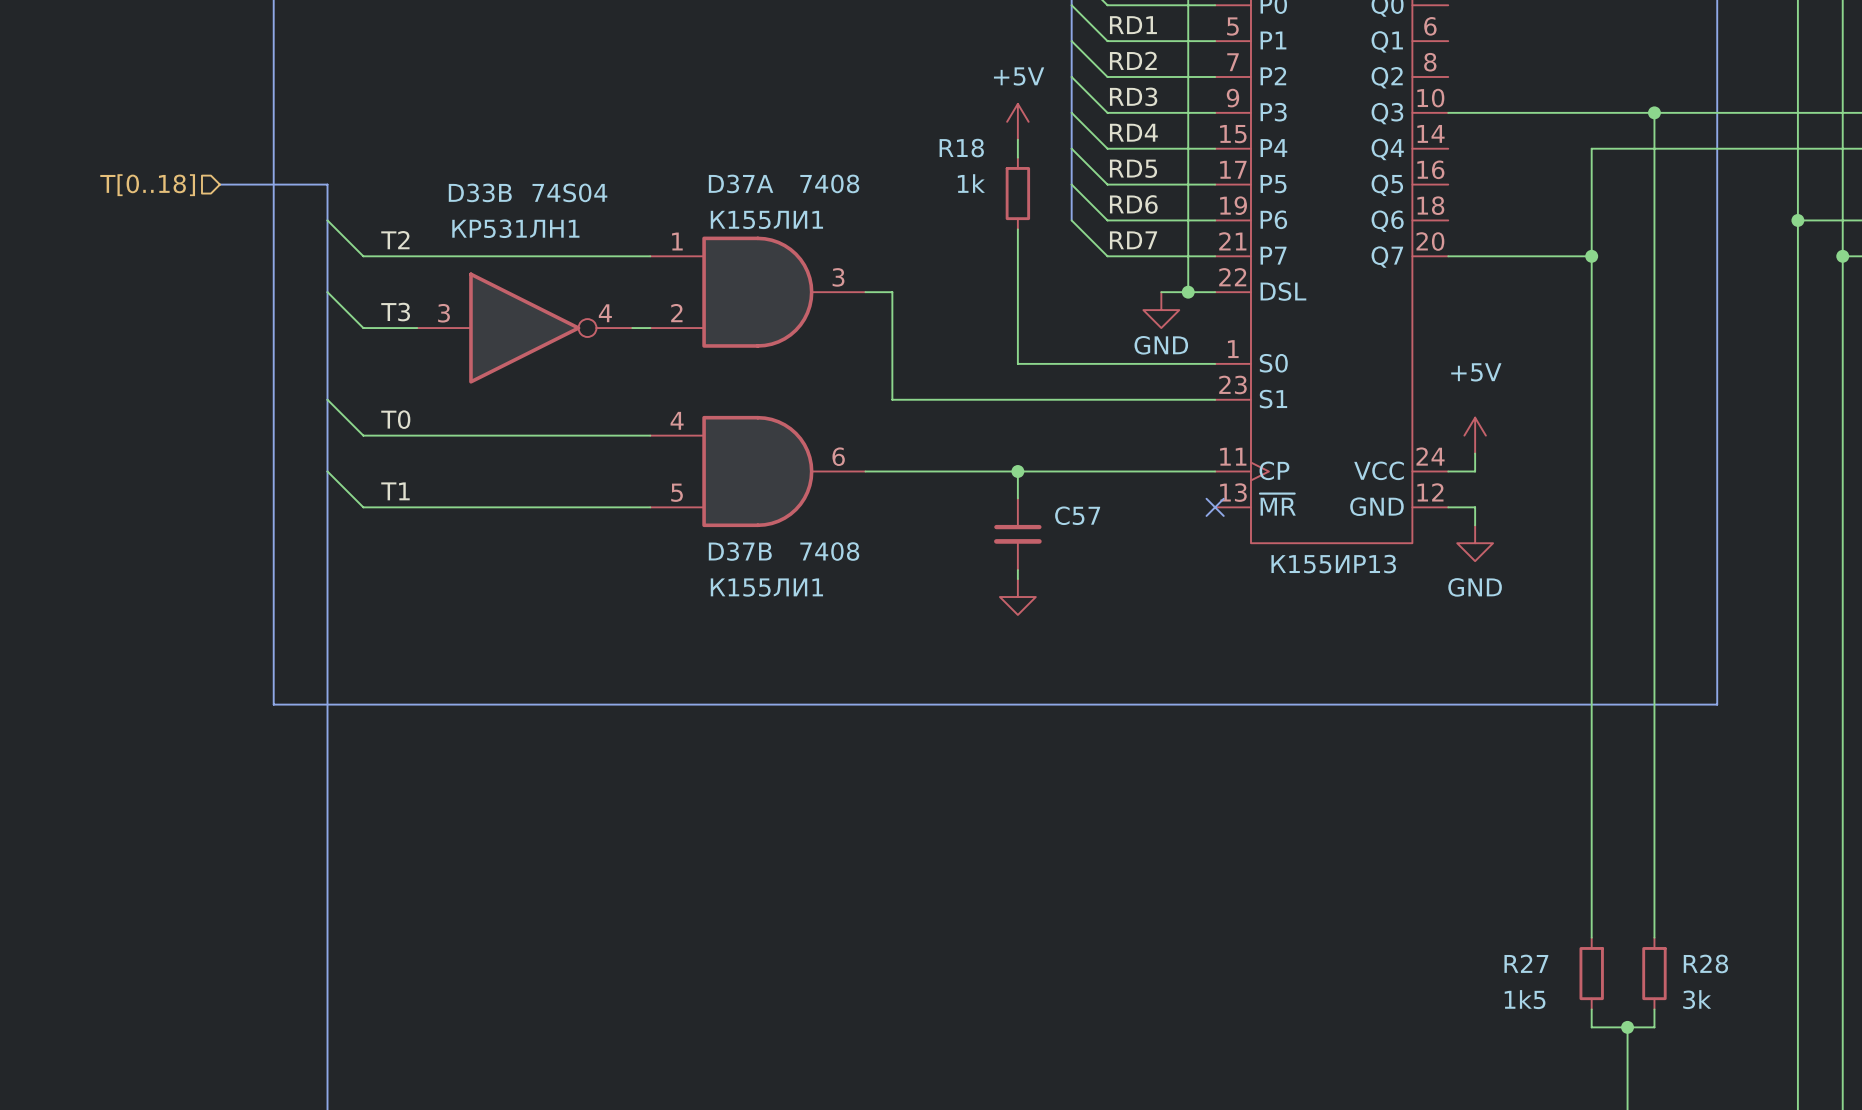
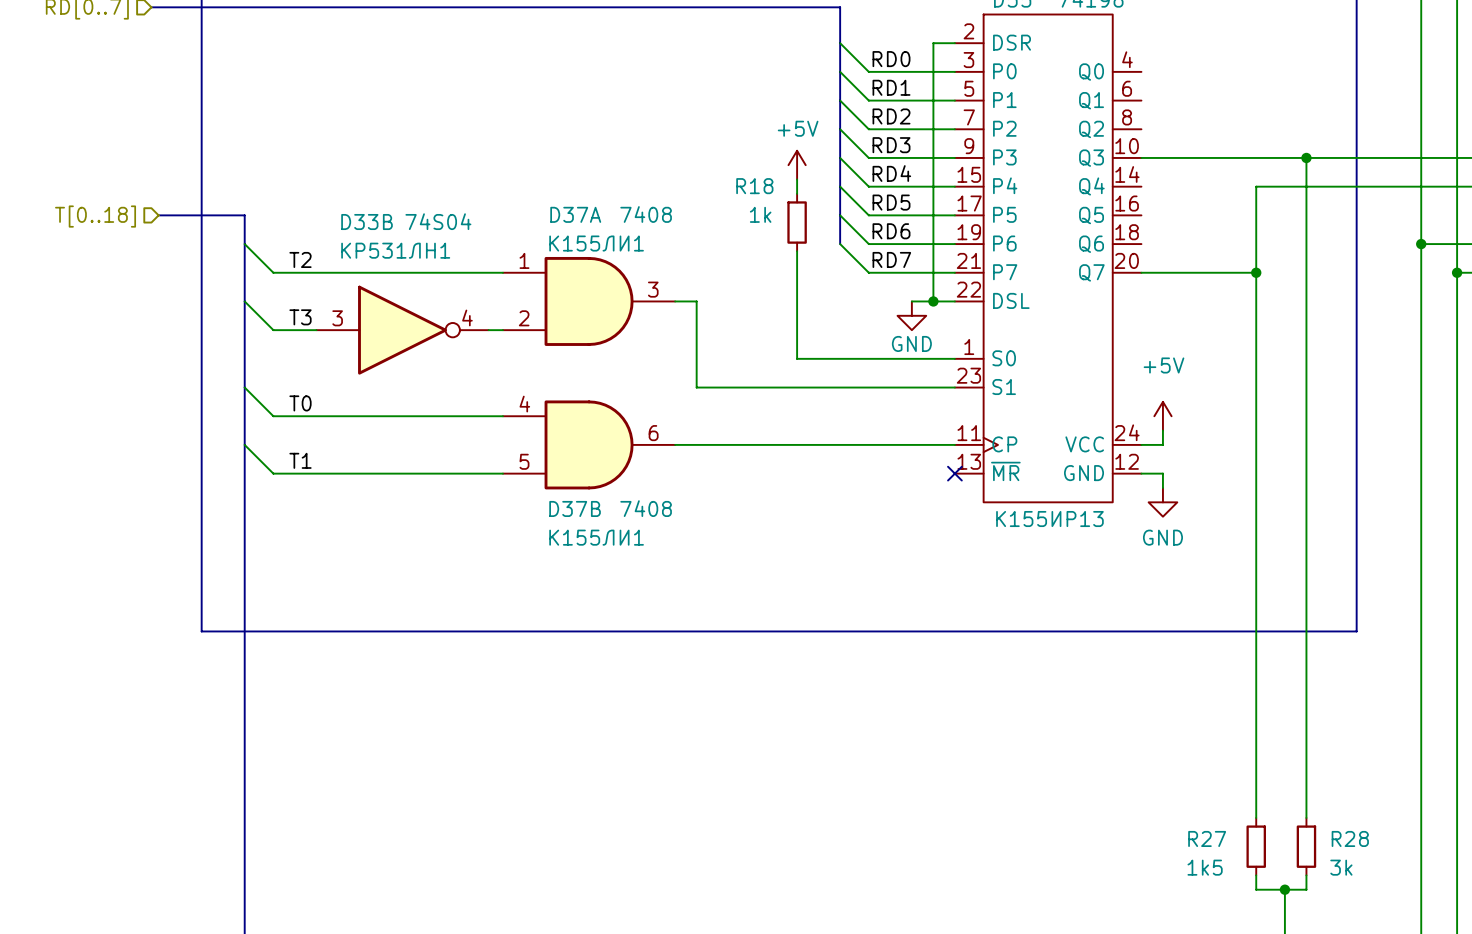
wire: (1017, 471) (1017, 498) -> none
junction: (1017, 471) -> none
C57: (1017, 534) -> none
wire: (1017, 570) (1017, 579) -> none
power symbol: (1017, 597) -> none

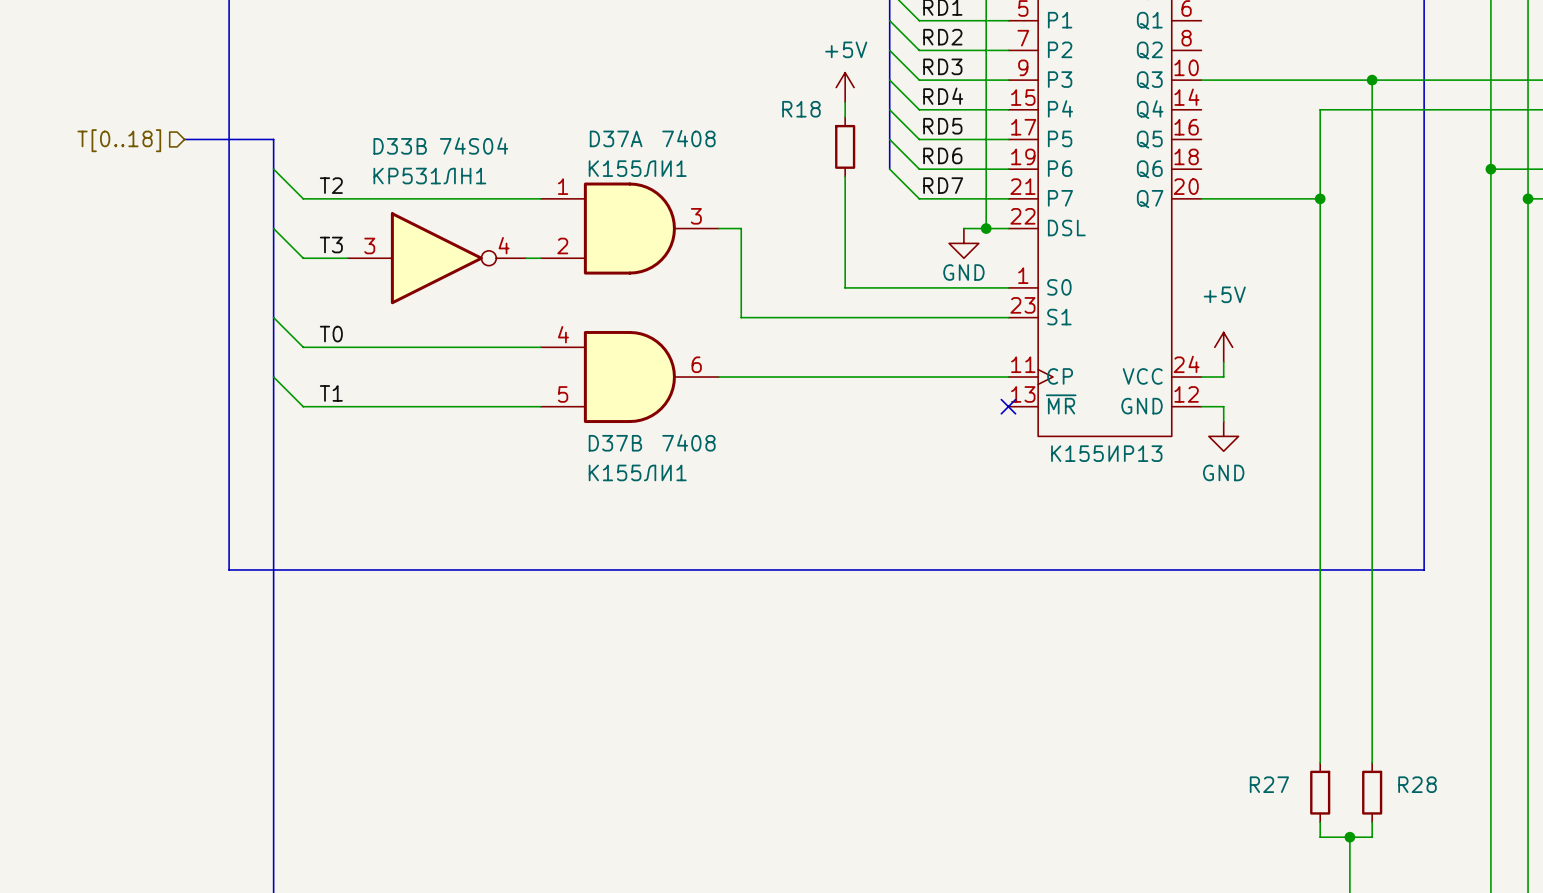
R18 value: 1k (760, 214) -> none
R27 value: 1k5 (1205, 867) -> none
R28 value: 3k (1341, 867) -> none

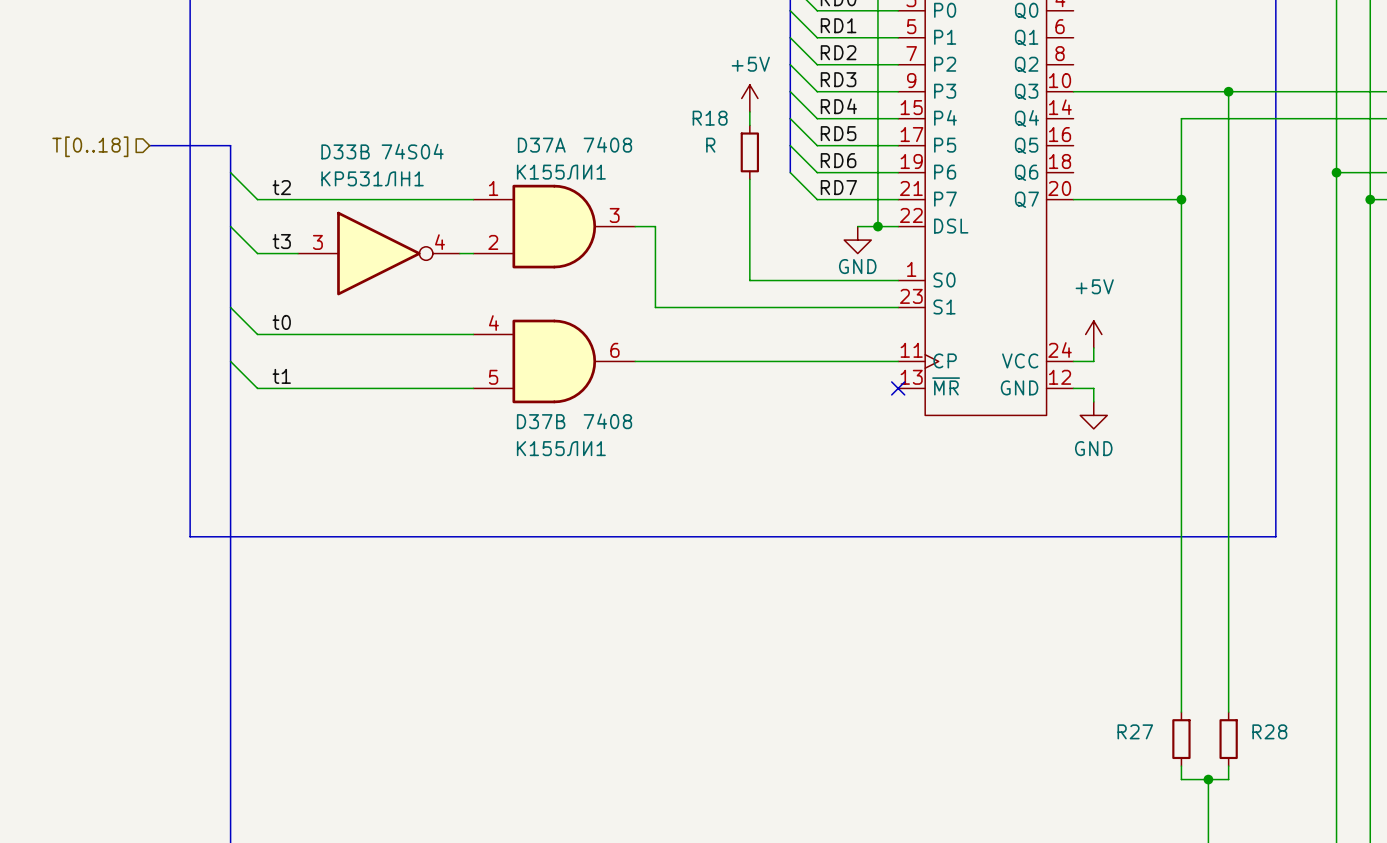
R18 value: none -> R (710, 145)
label: T2 (331, 185) -> t2 (281, 187)
label: T3 (331, 244) -> t3 (281, 241)
label: T0 (331, 334) -> t0 (281, 322)
label: T1 (331, 393) -> t1 (281, 376)
part text: К155ИР13 (1106, 453) -> none

